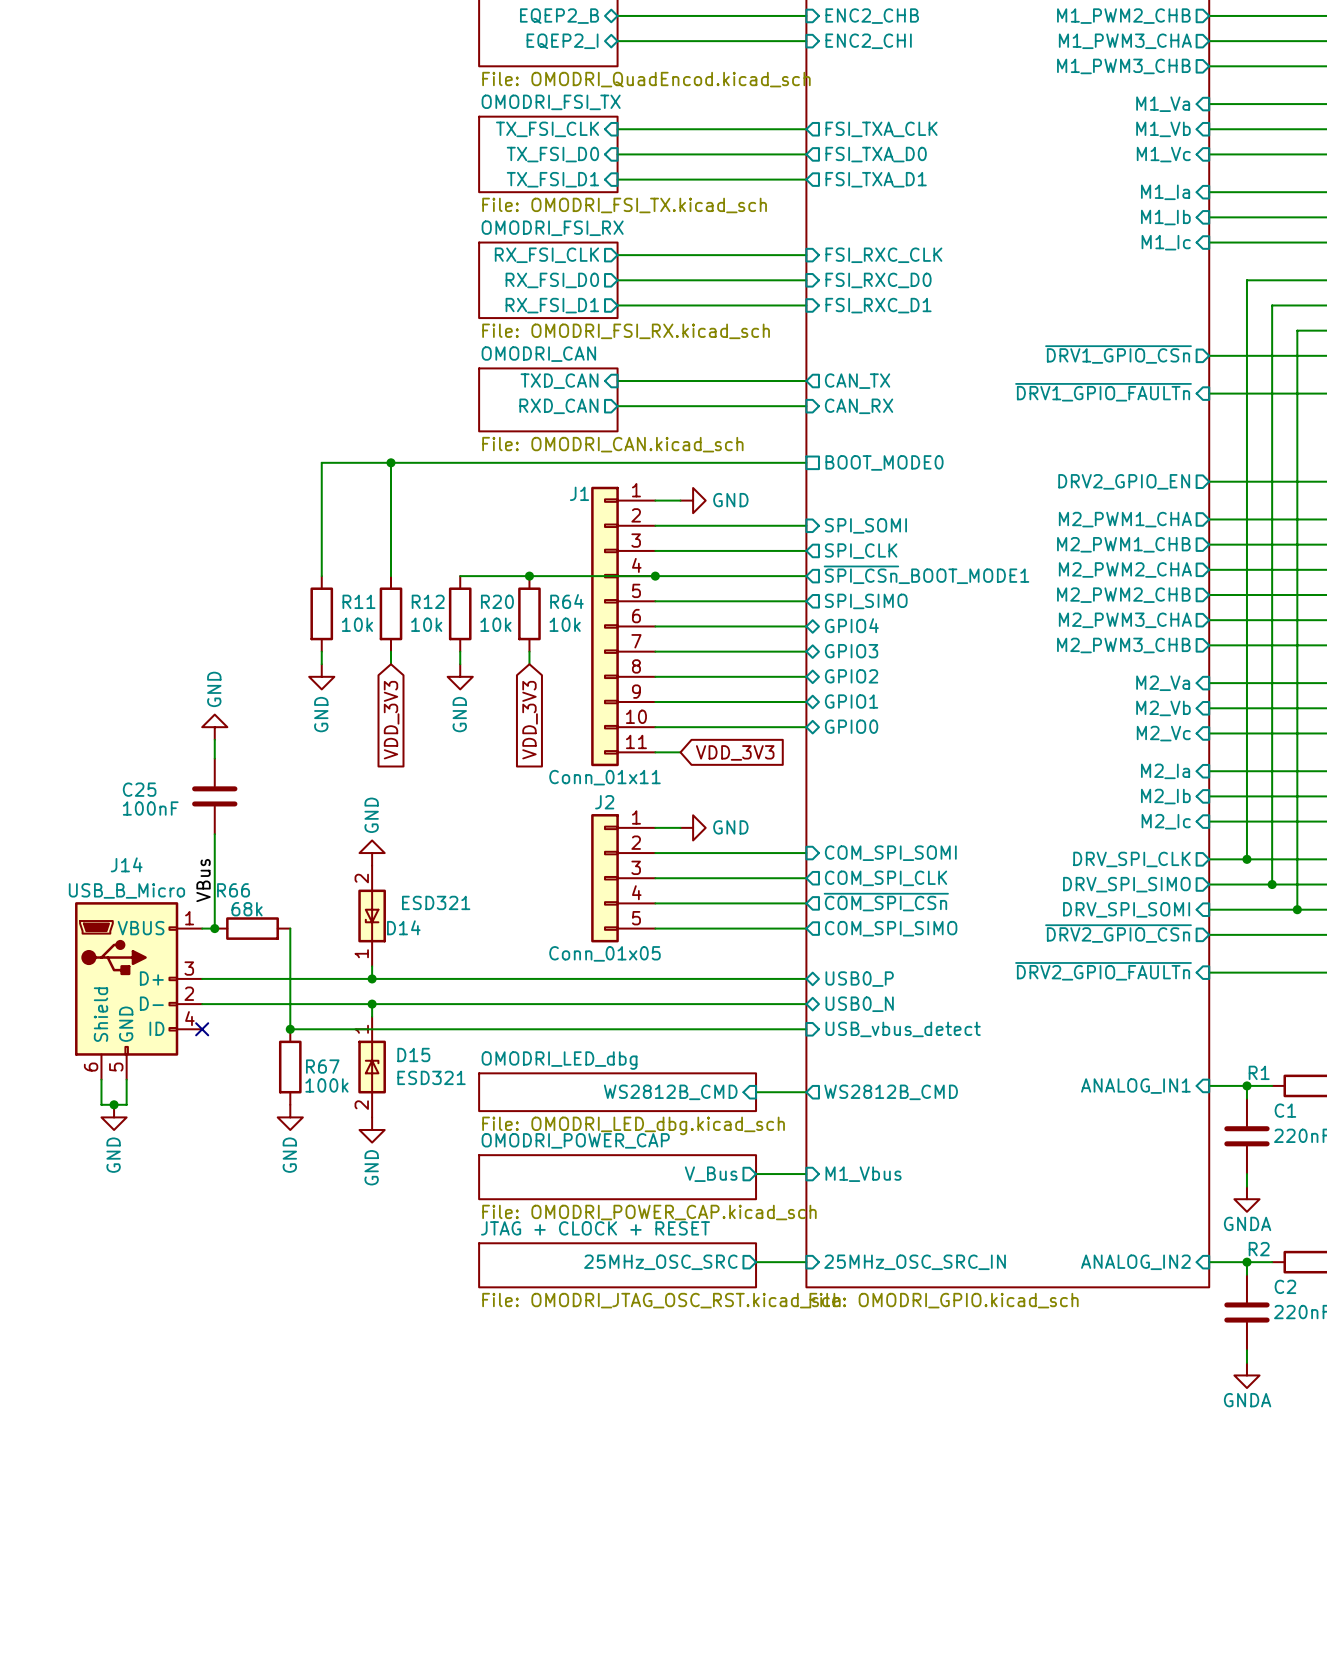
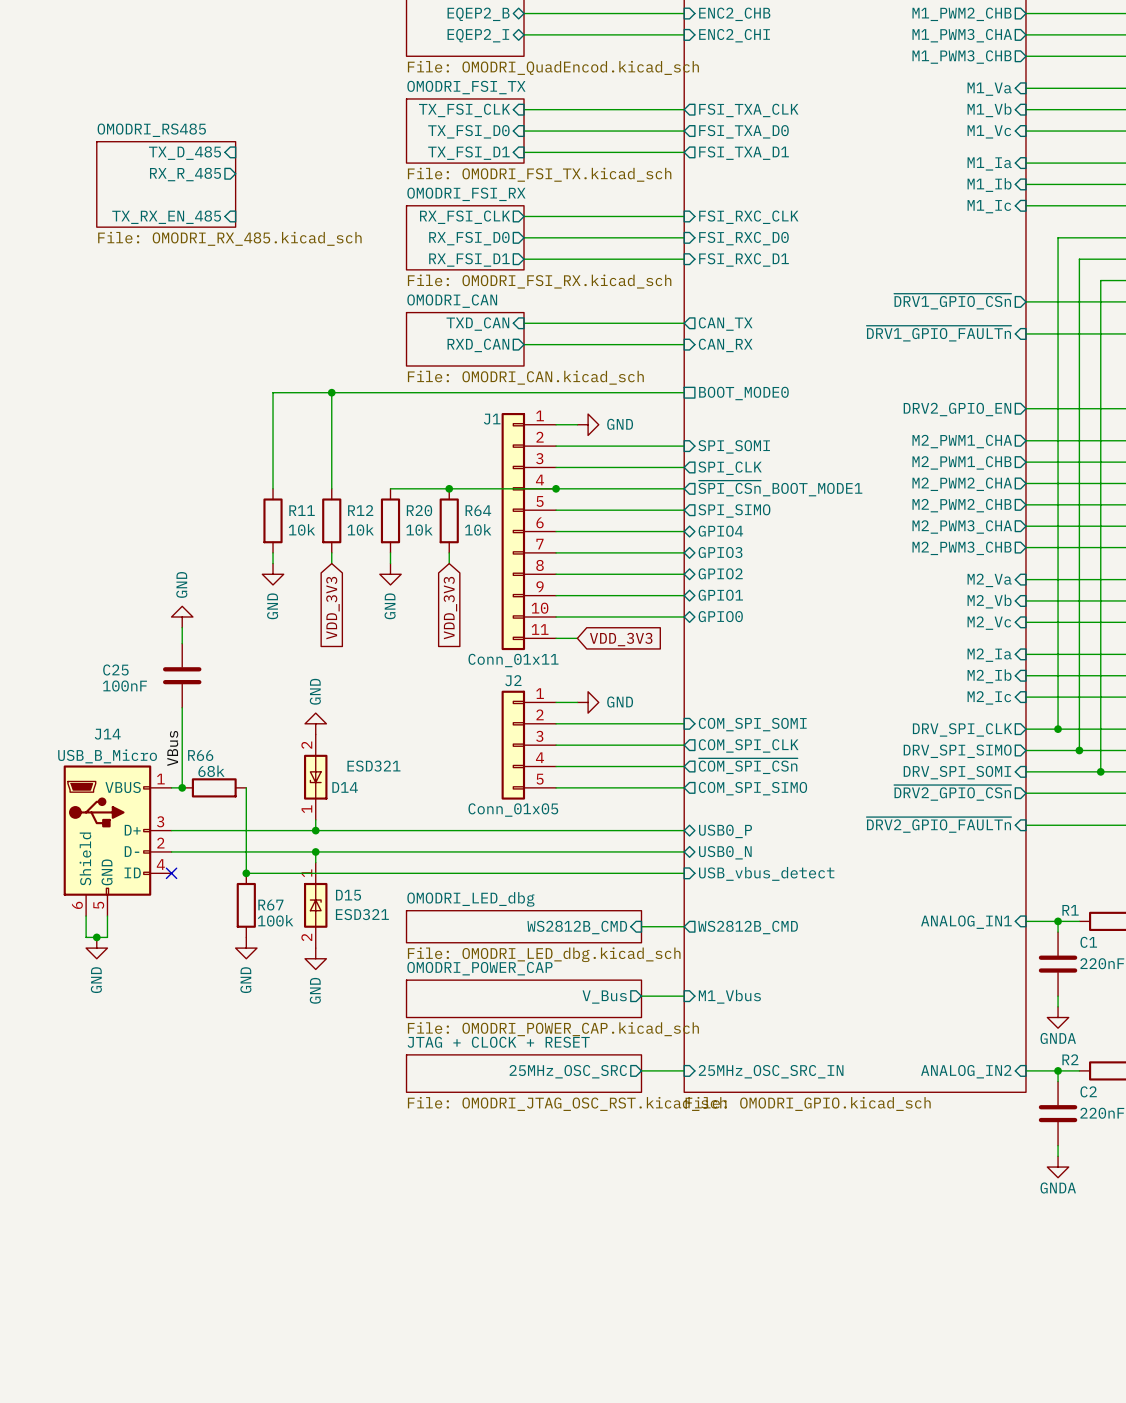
sheet pin: none -> TX_D_485 (185, 153)
sheet pin: none -> RX_R_485 (185, 174)
sheet OMODRI_RS485: none -> File: OMODRI_RX_485.kicad_sch (166, 184)
sheet pin: none -> TX_RX_EN_485 (166, 217)

